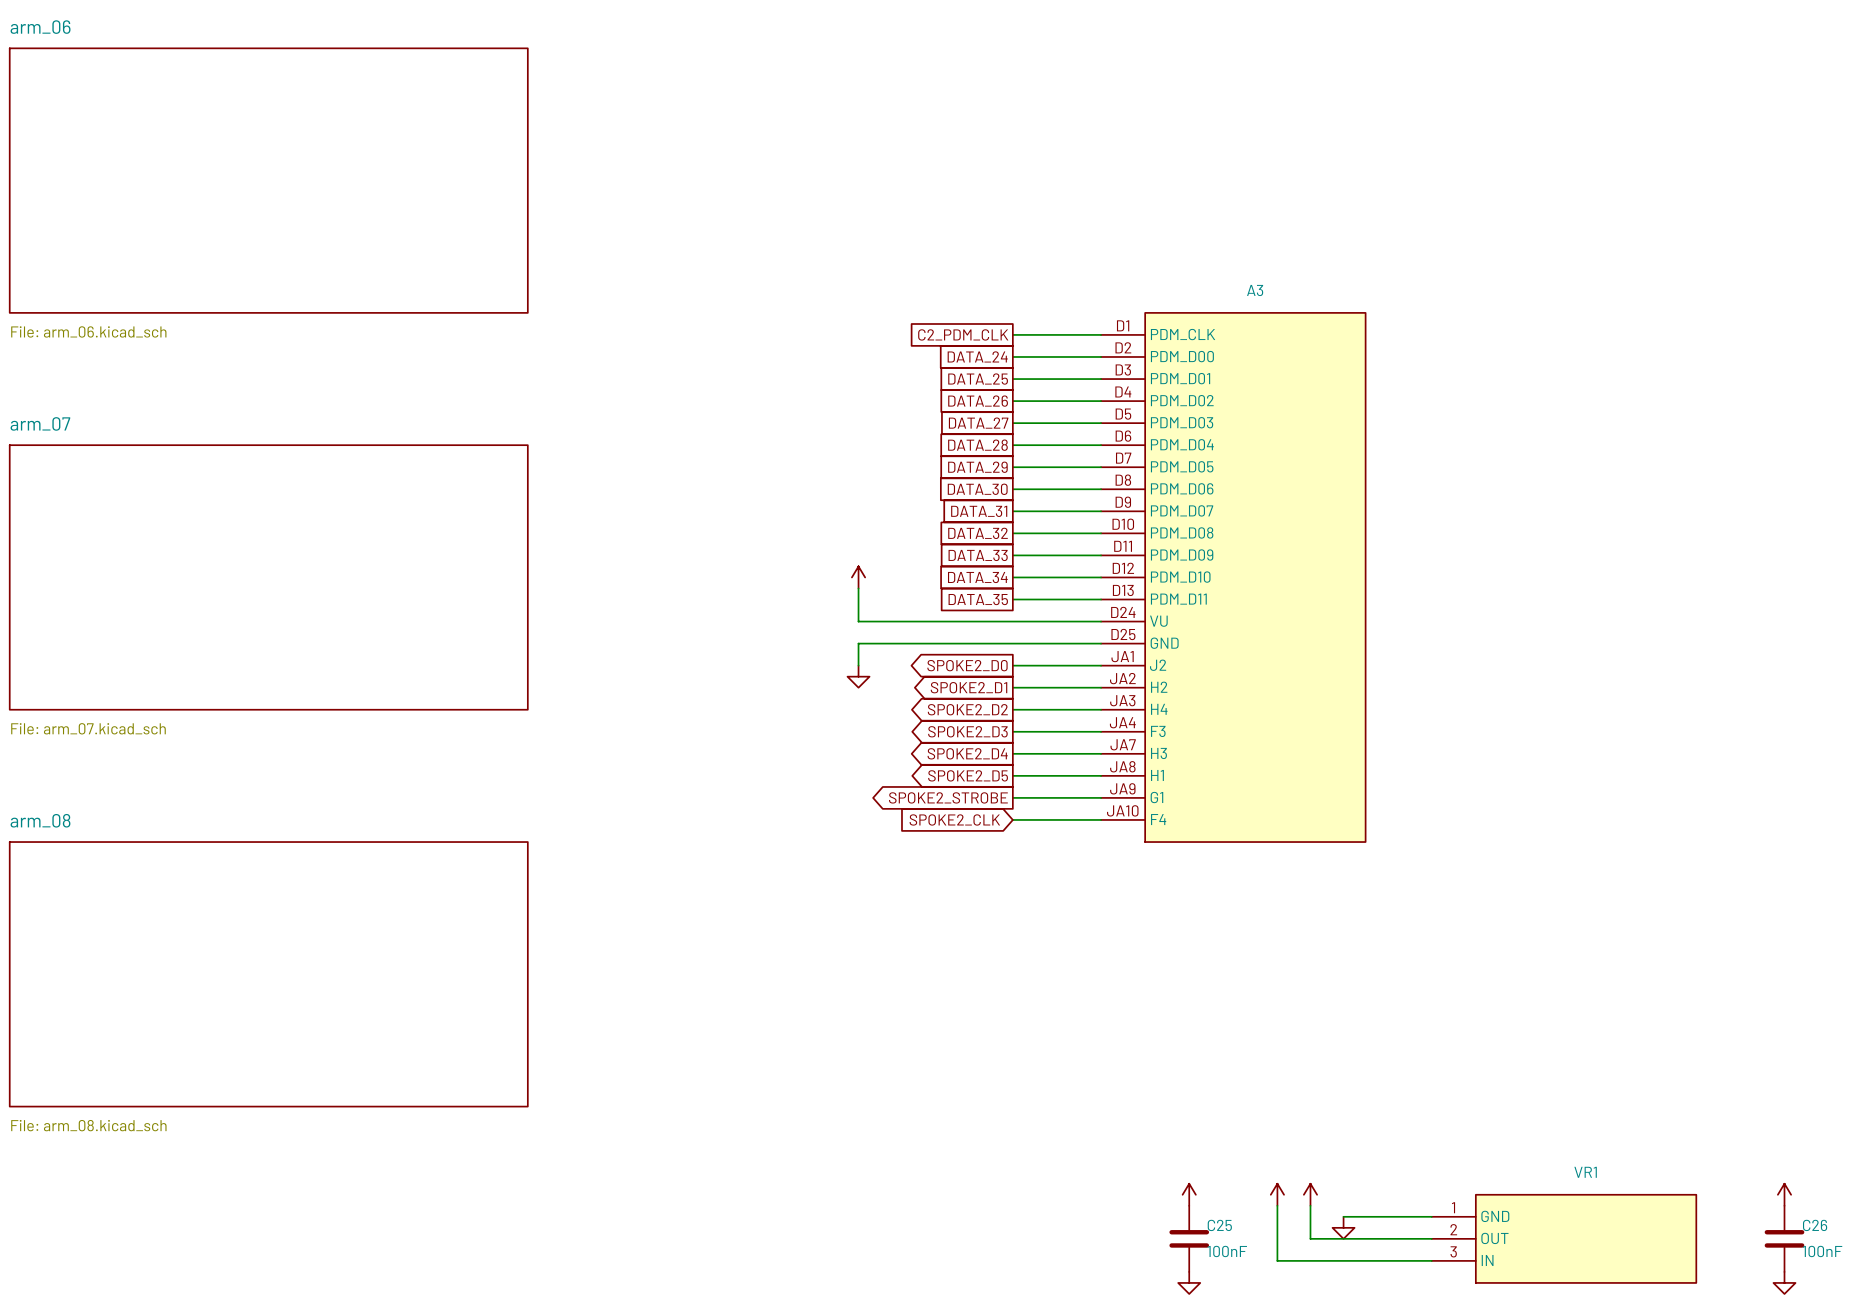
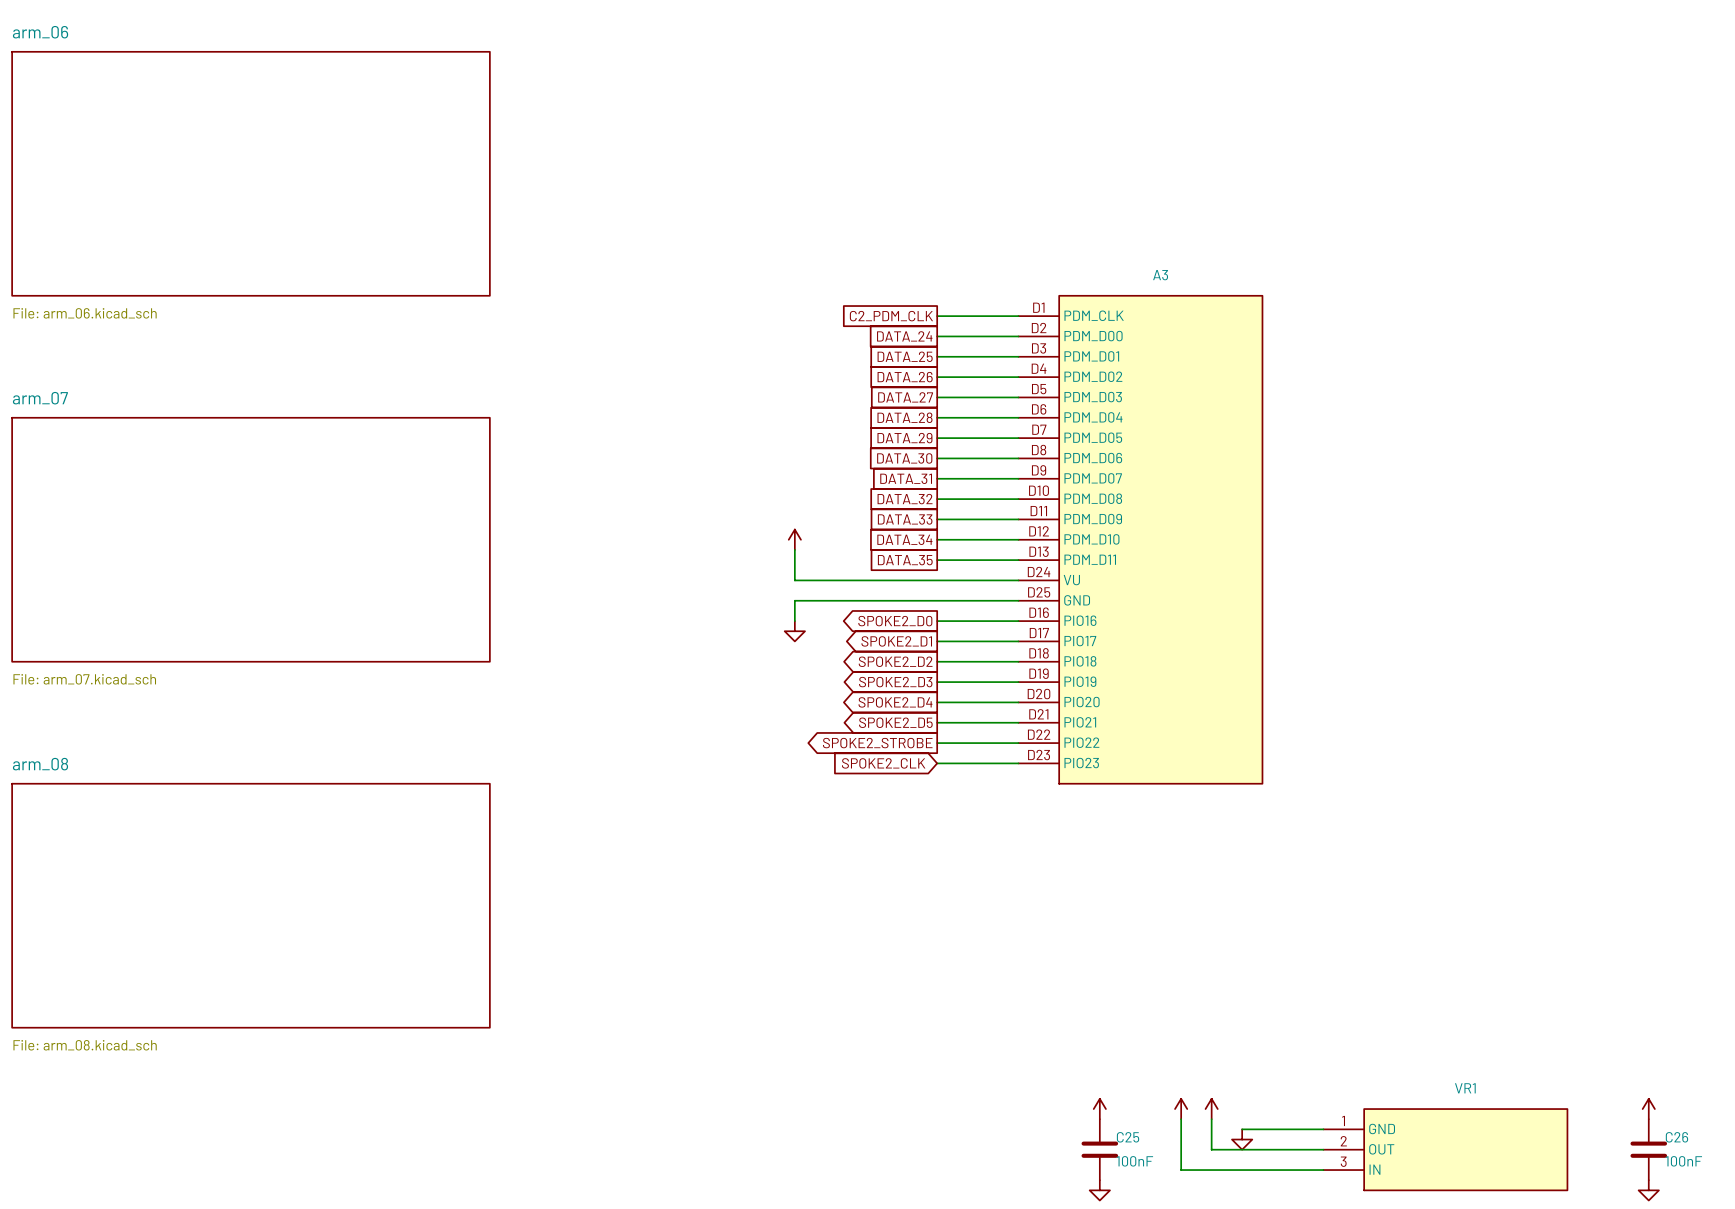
A3 symbol: [1101, 312, 1366, 843] -> [1018, 295, 1263, 784]

